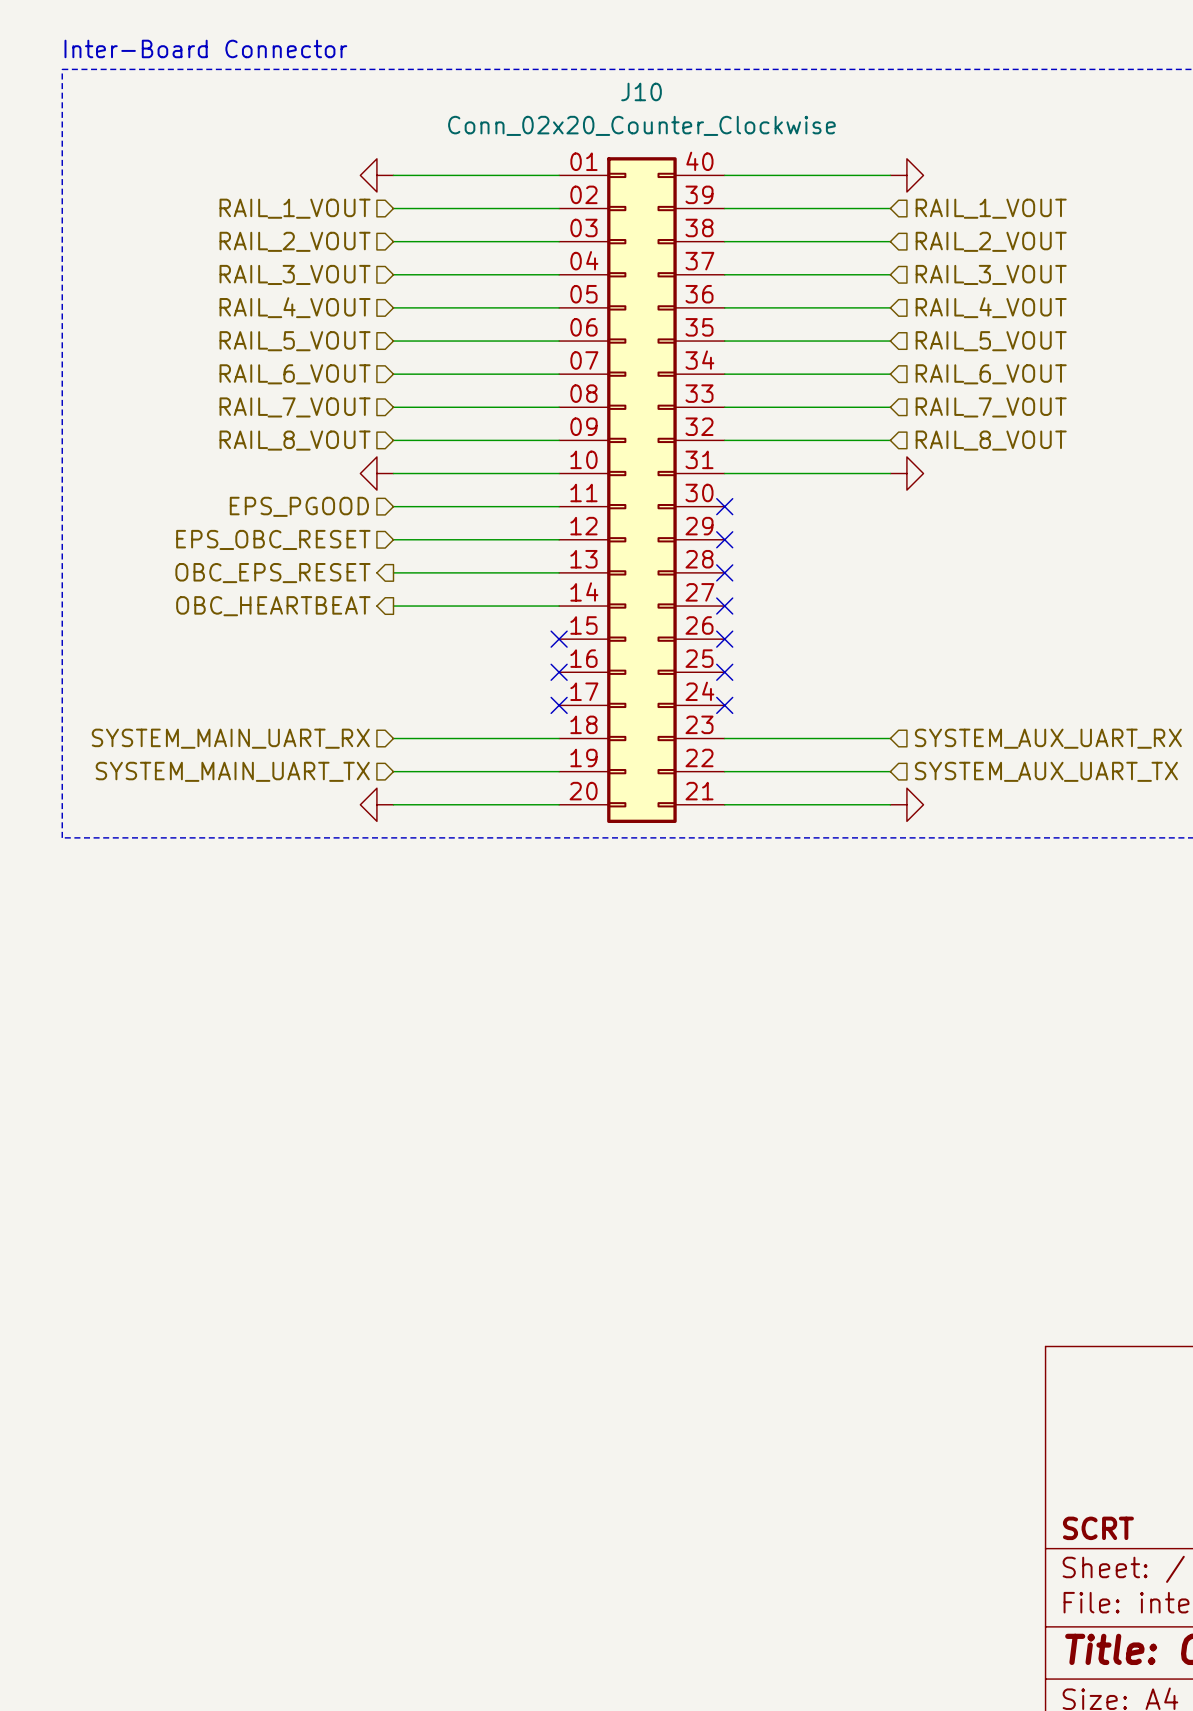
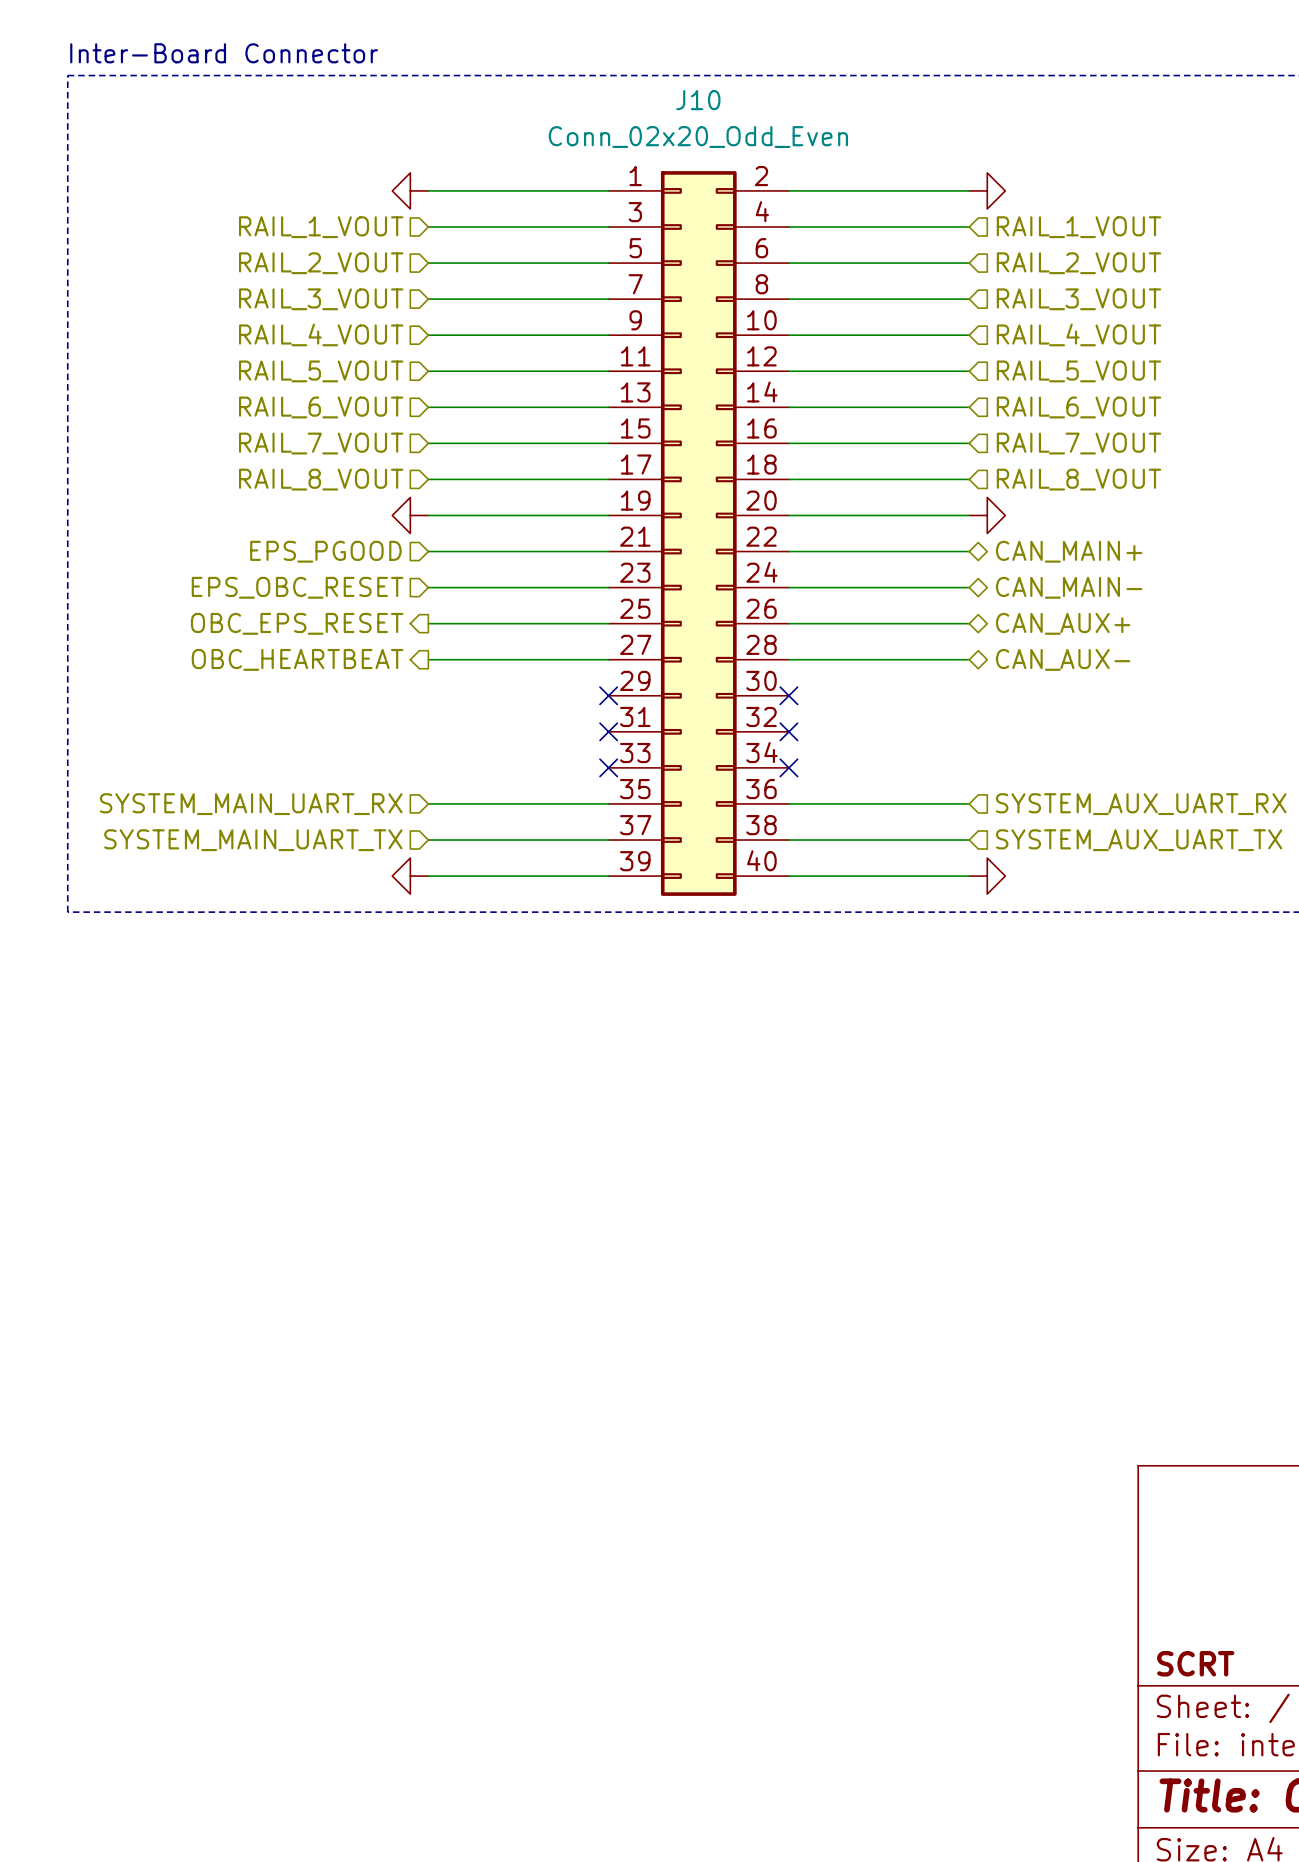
J10 value: Conn_02x20_Counter_Clockwise (641, 125) -> Conn_02x20_Odd_Even (698, 137)
J10 symbol: [559, 157, 725, 823] -> [608, 171, 789, 896]
wire: none -> (788, 551) (969, 551)
no-connect mark: (724, 506) -> none
hierarchical label: none -> CAN_MAIN+ (1069, 551)
wire: none -> (788, 587) (969, 587)
no-connect mark: (724, 539) -> none
hierarchical label: none -> CAN_MAIN- (1069, 587)
wire: none -> (788, 623) (969, 623)
no-connect mark: (724, 572) -> none
hierarchical label: none -> CAN_AUX+ (1063, 623)
wire: none -> (788, 659) (969, 659)
no-connect mark: (724, 606) -> none
hierarchical label: none -> CAN_AUX- (1063, 659)

